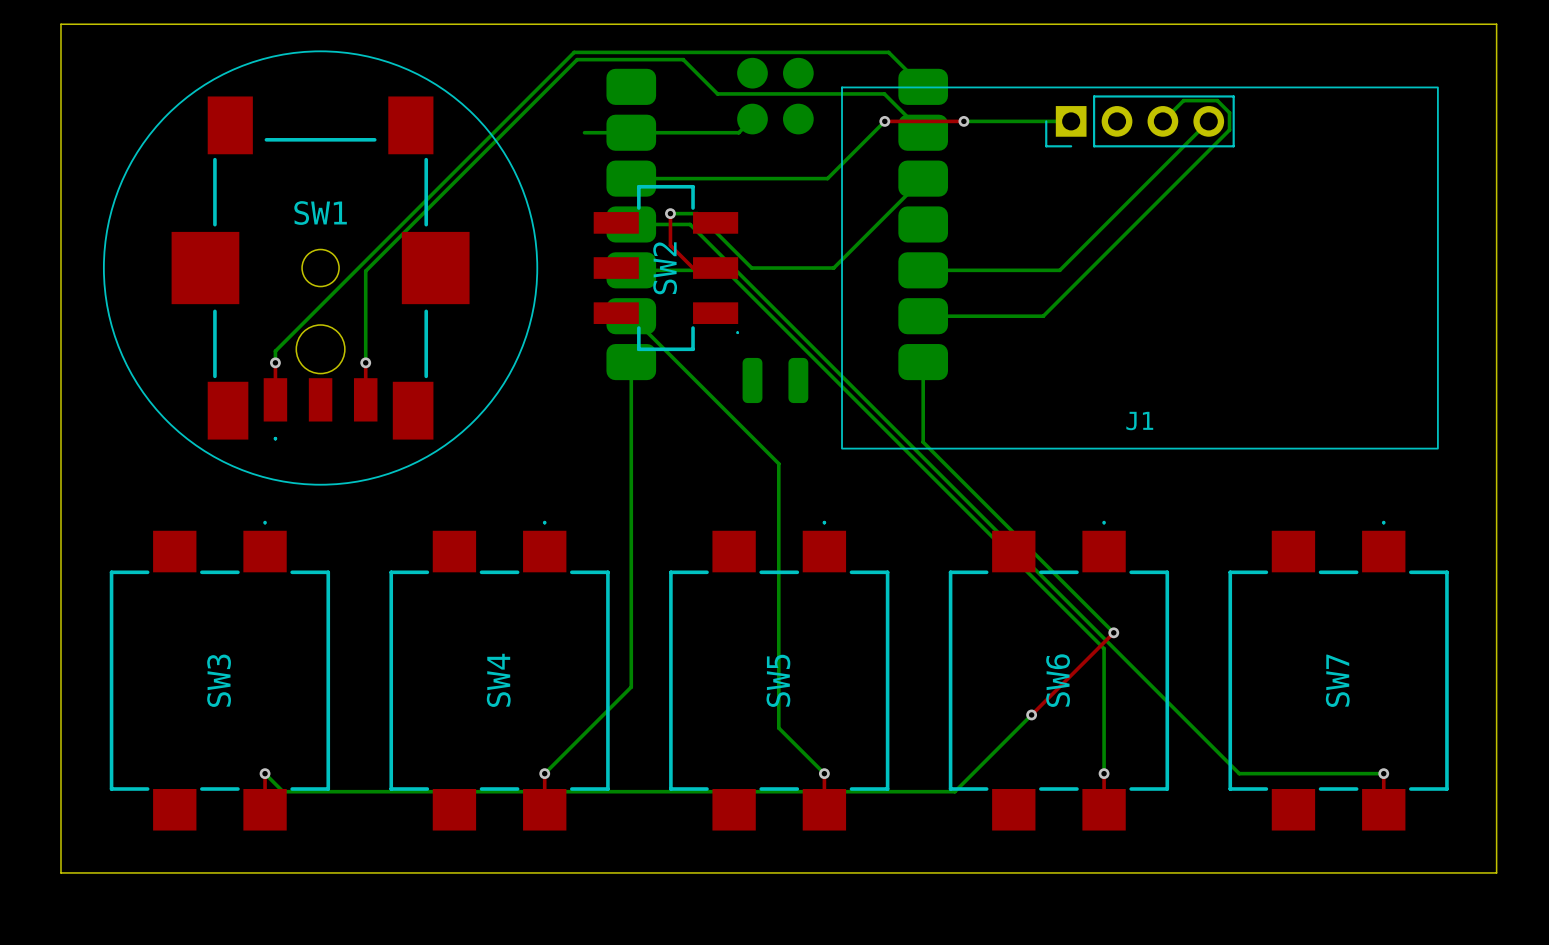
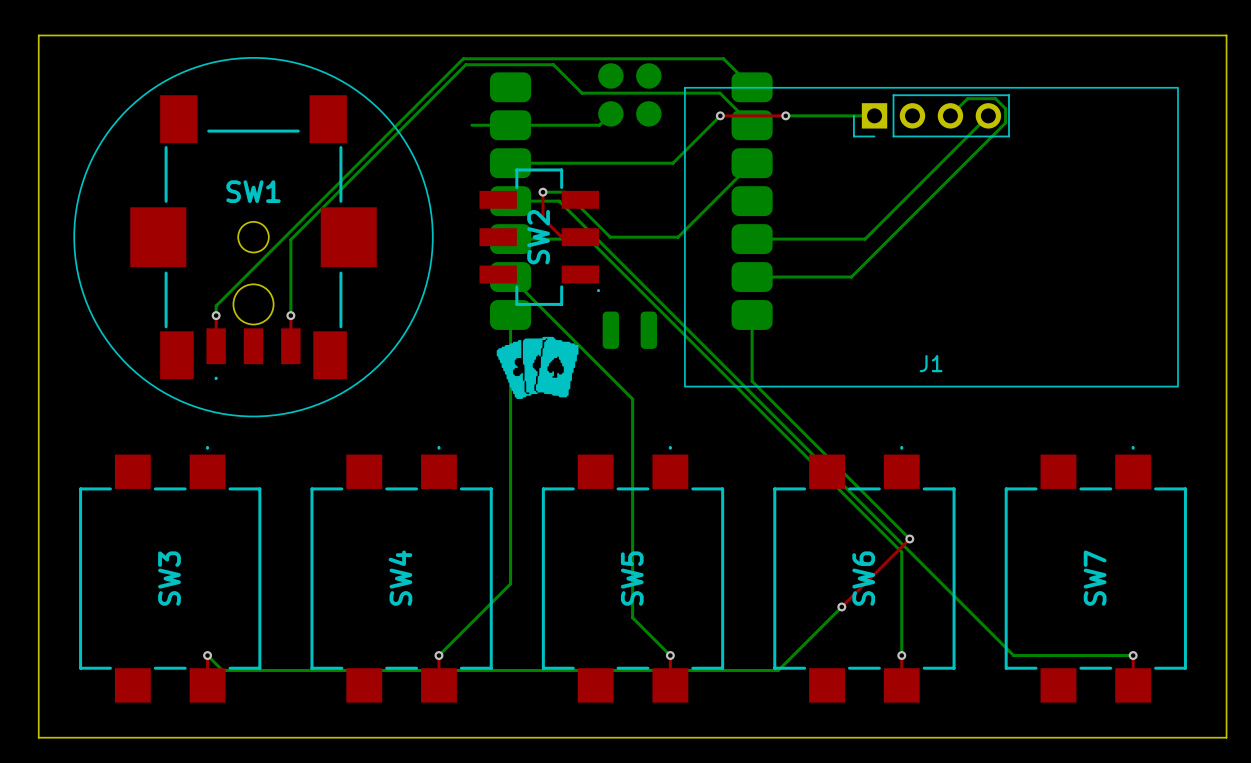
drawing: none -> [496, 336, 579, 399]

